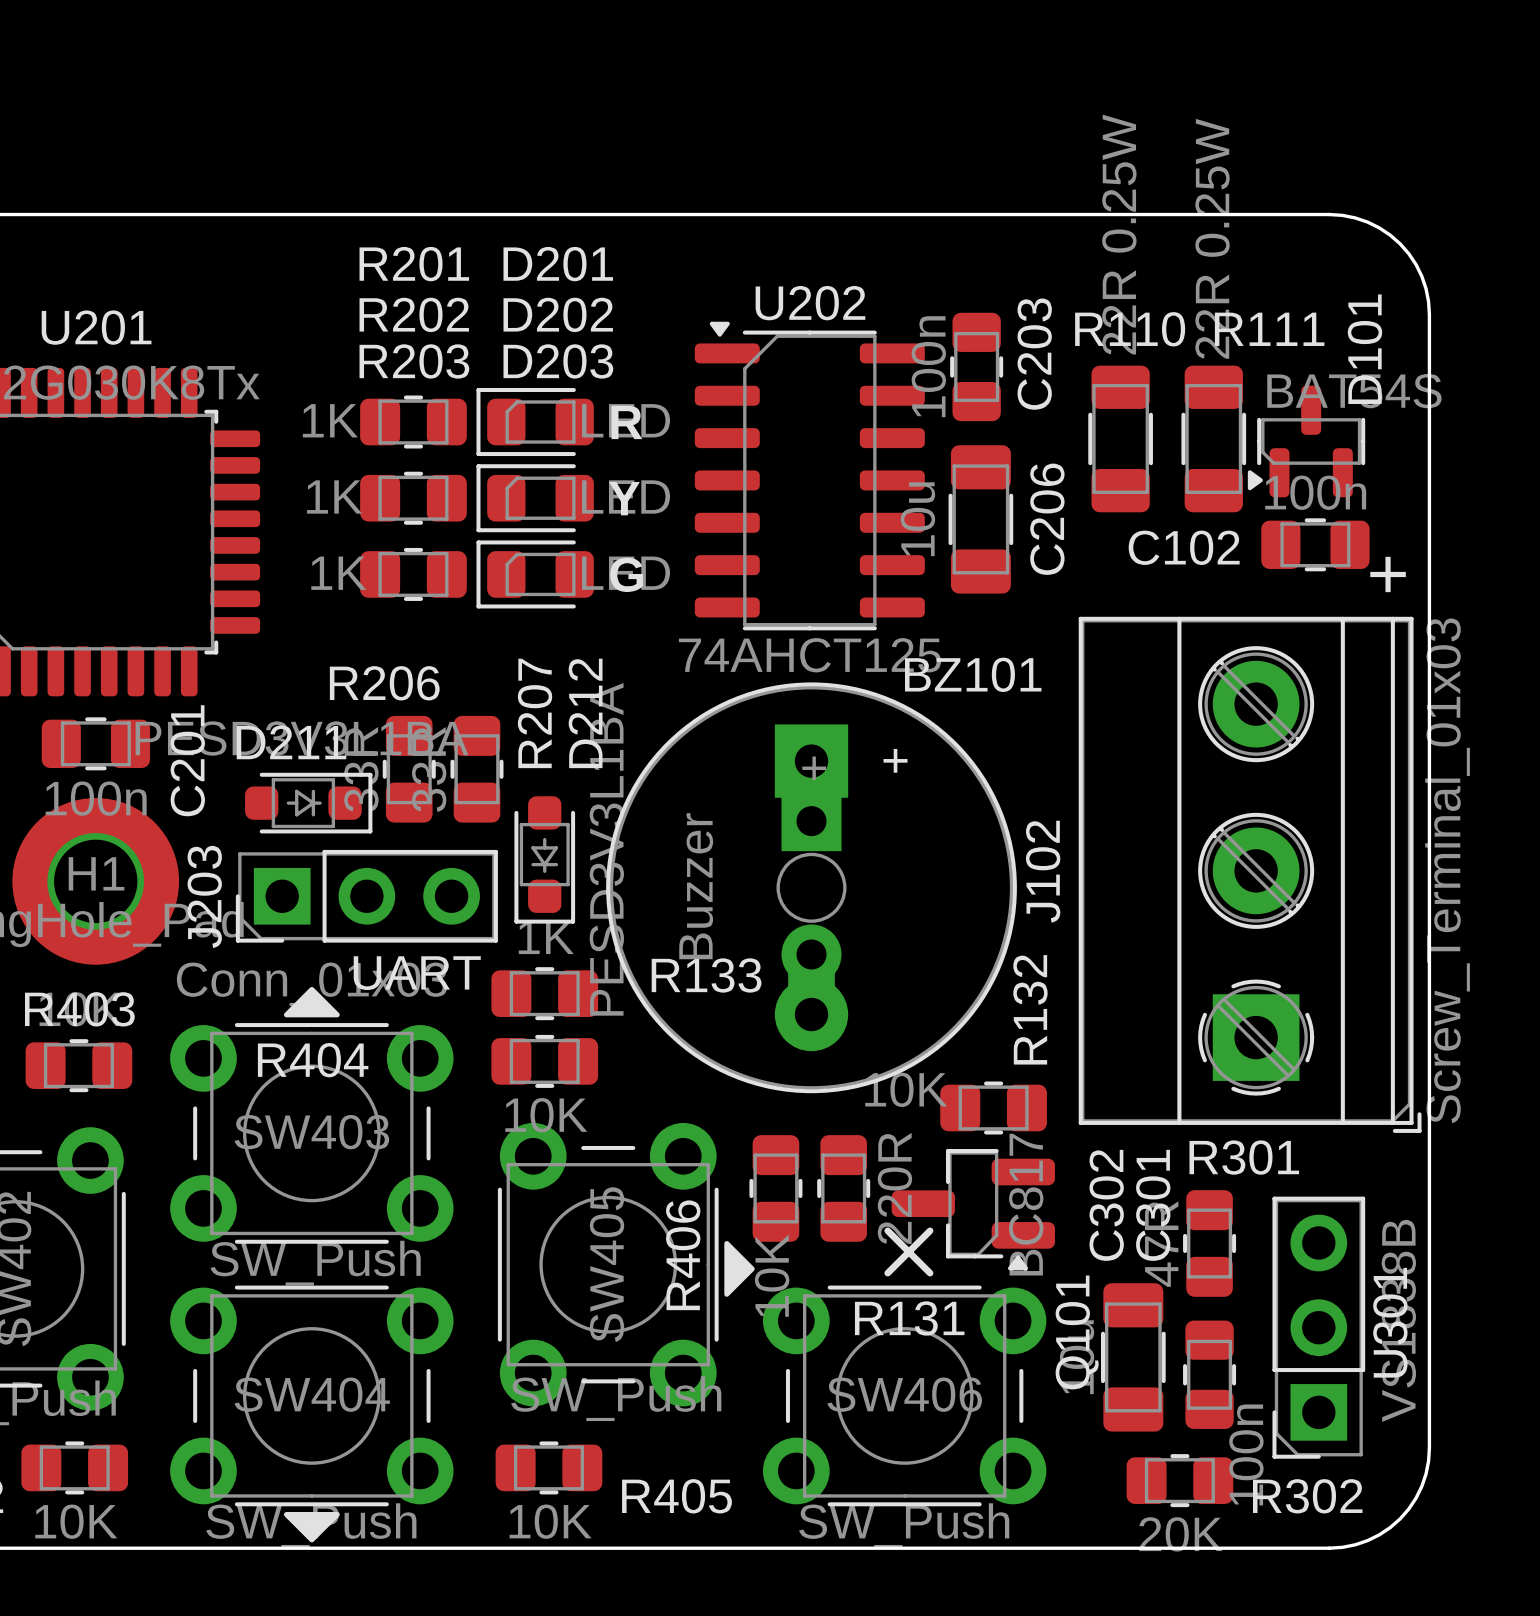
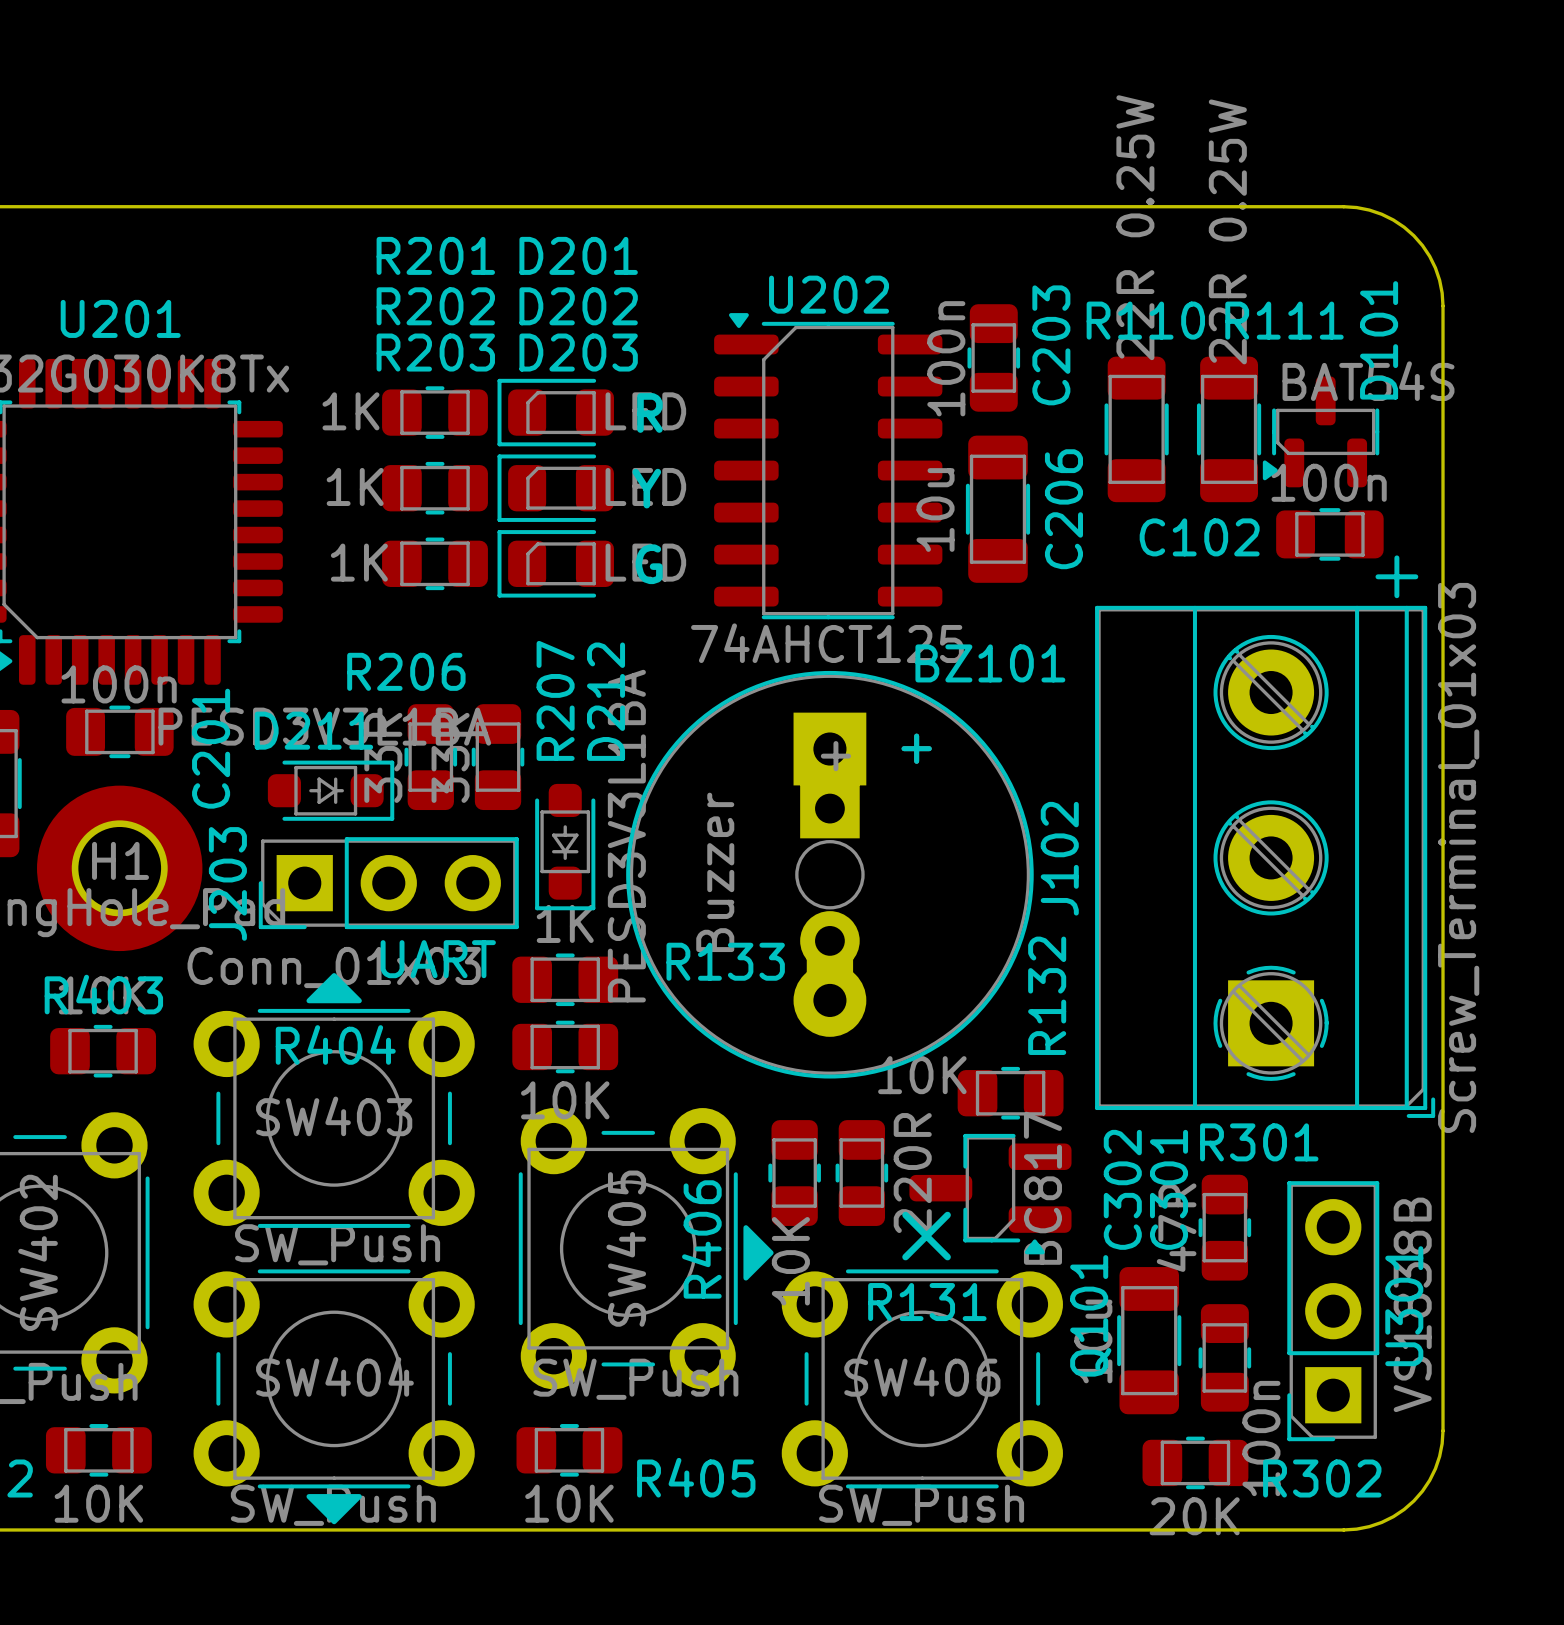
C201 value position: 100n (96, 798) -> 100n (119, 684)

